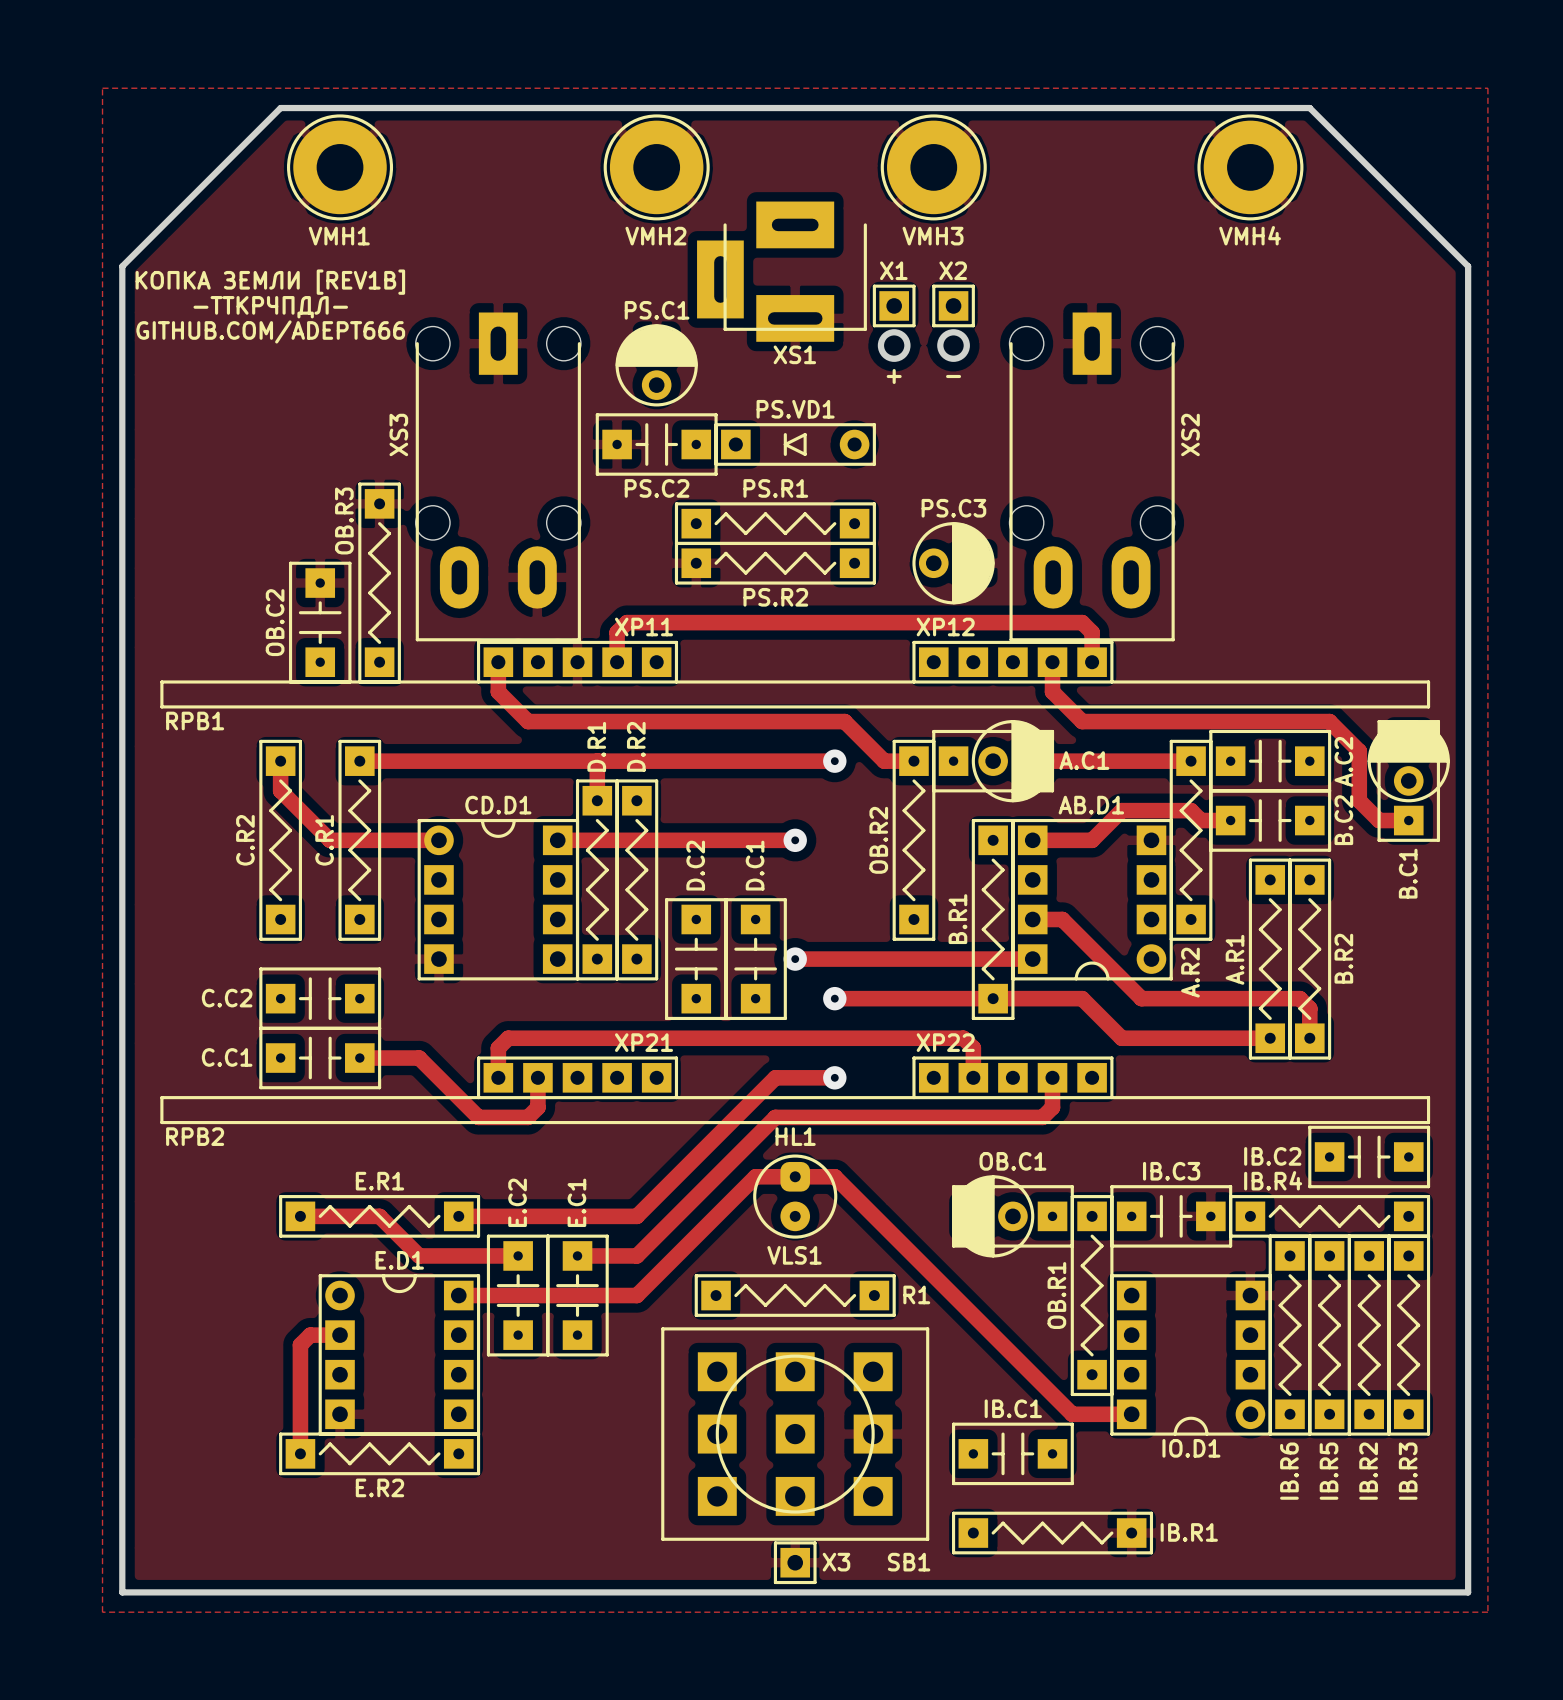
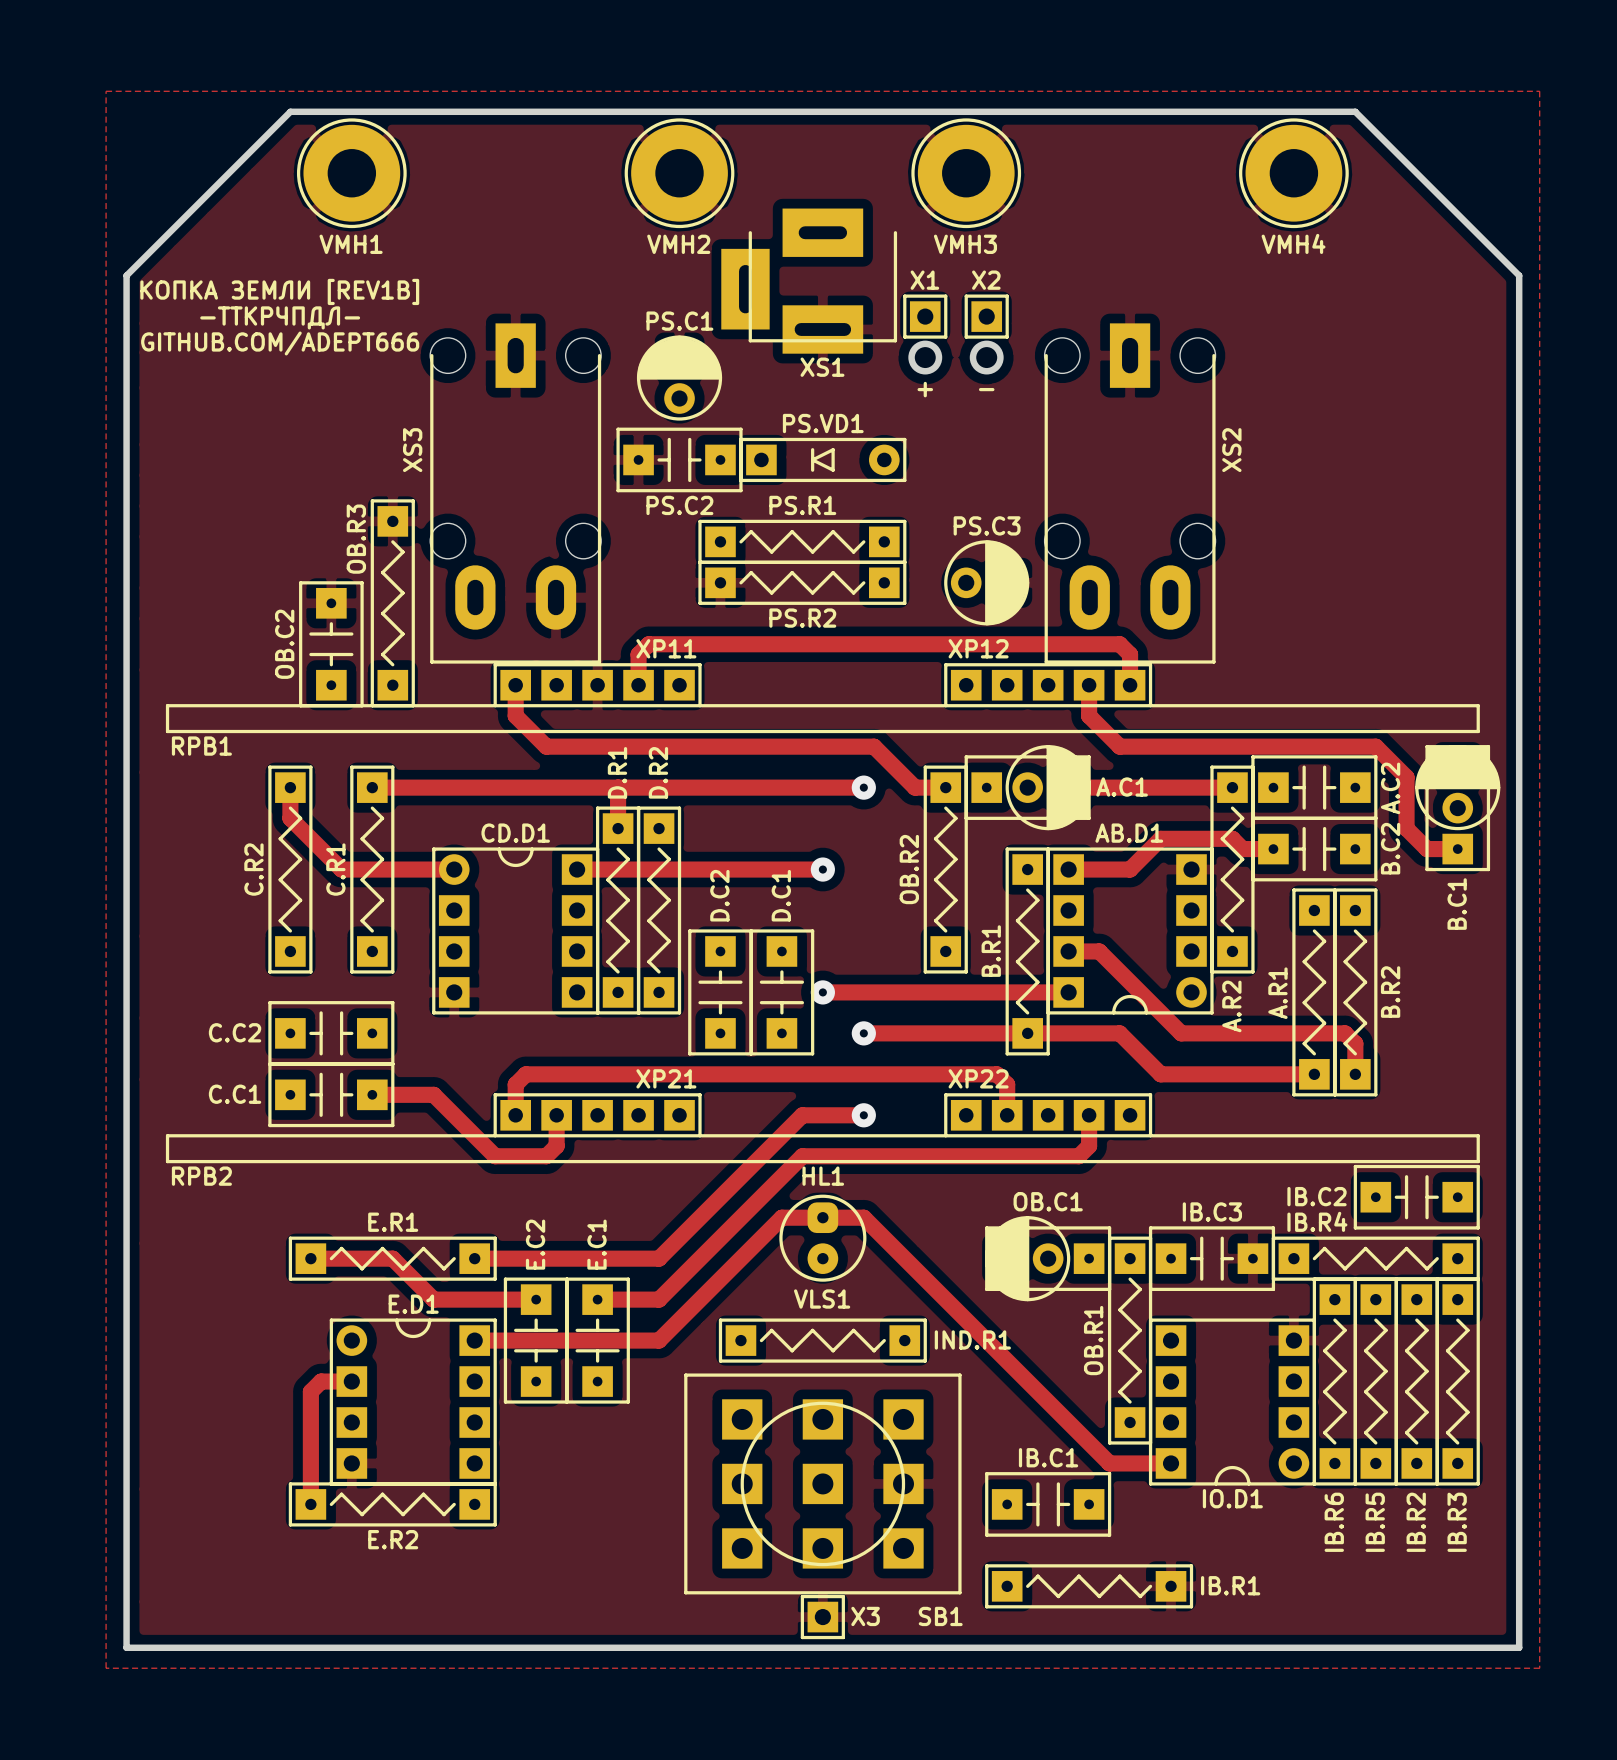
R1 name: R1 (916, 1294) -> IND.R1 (972, 1339)

